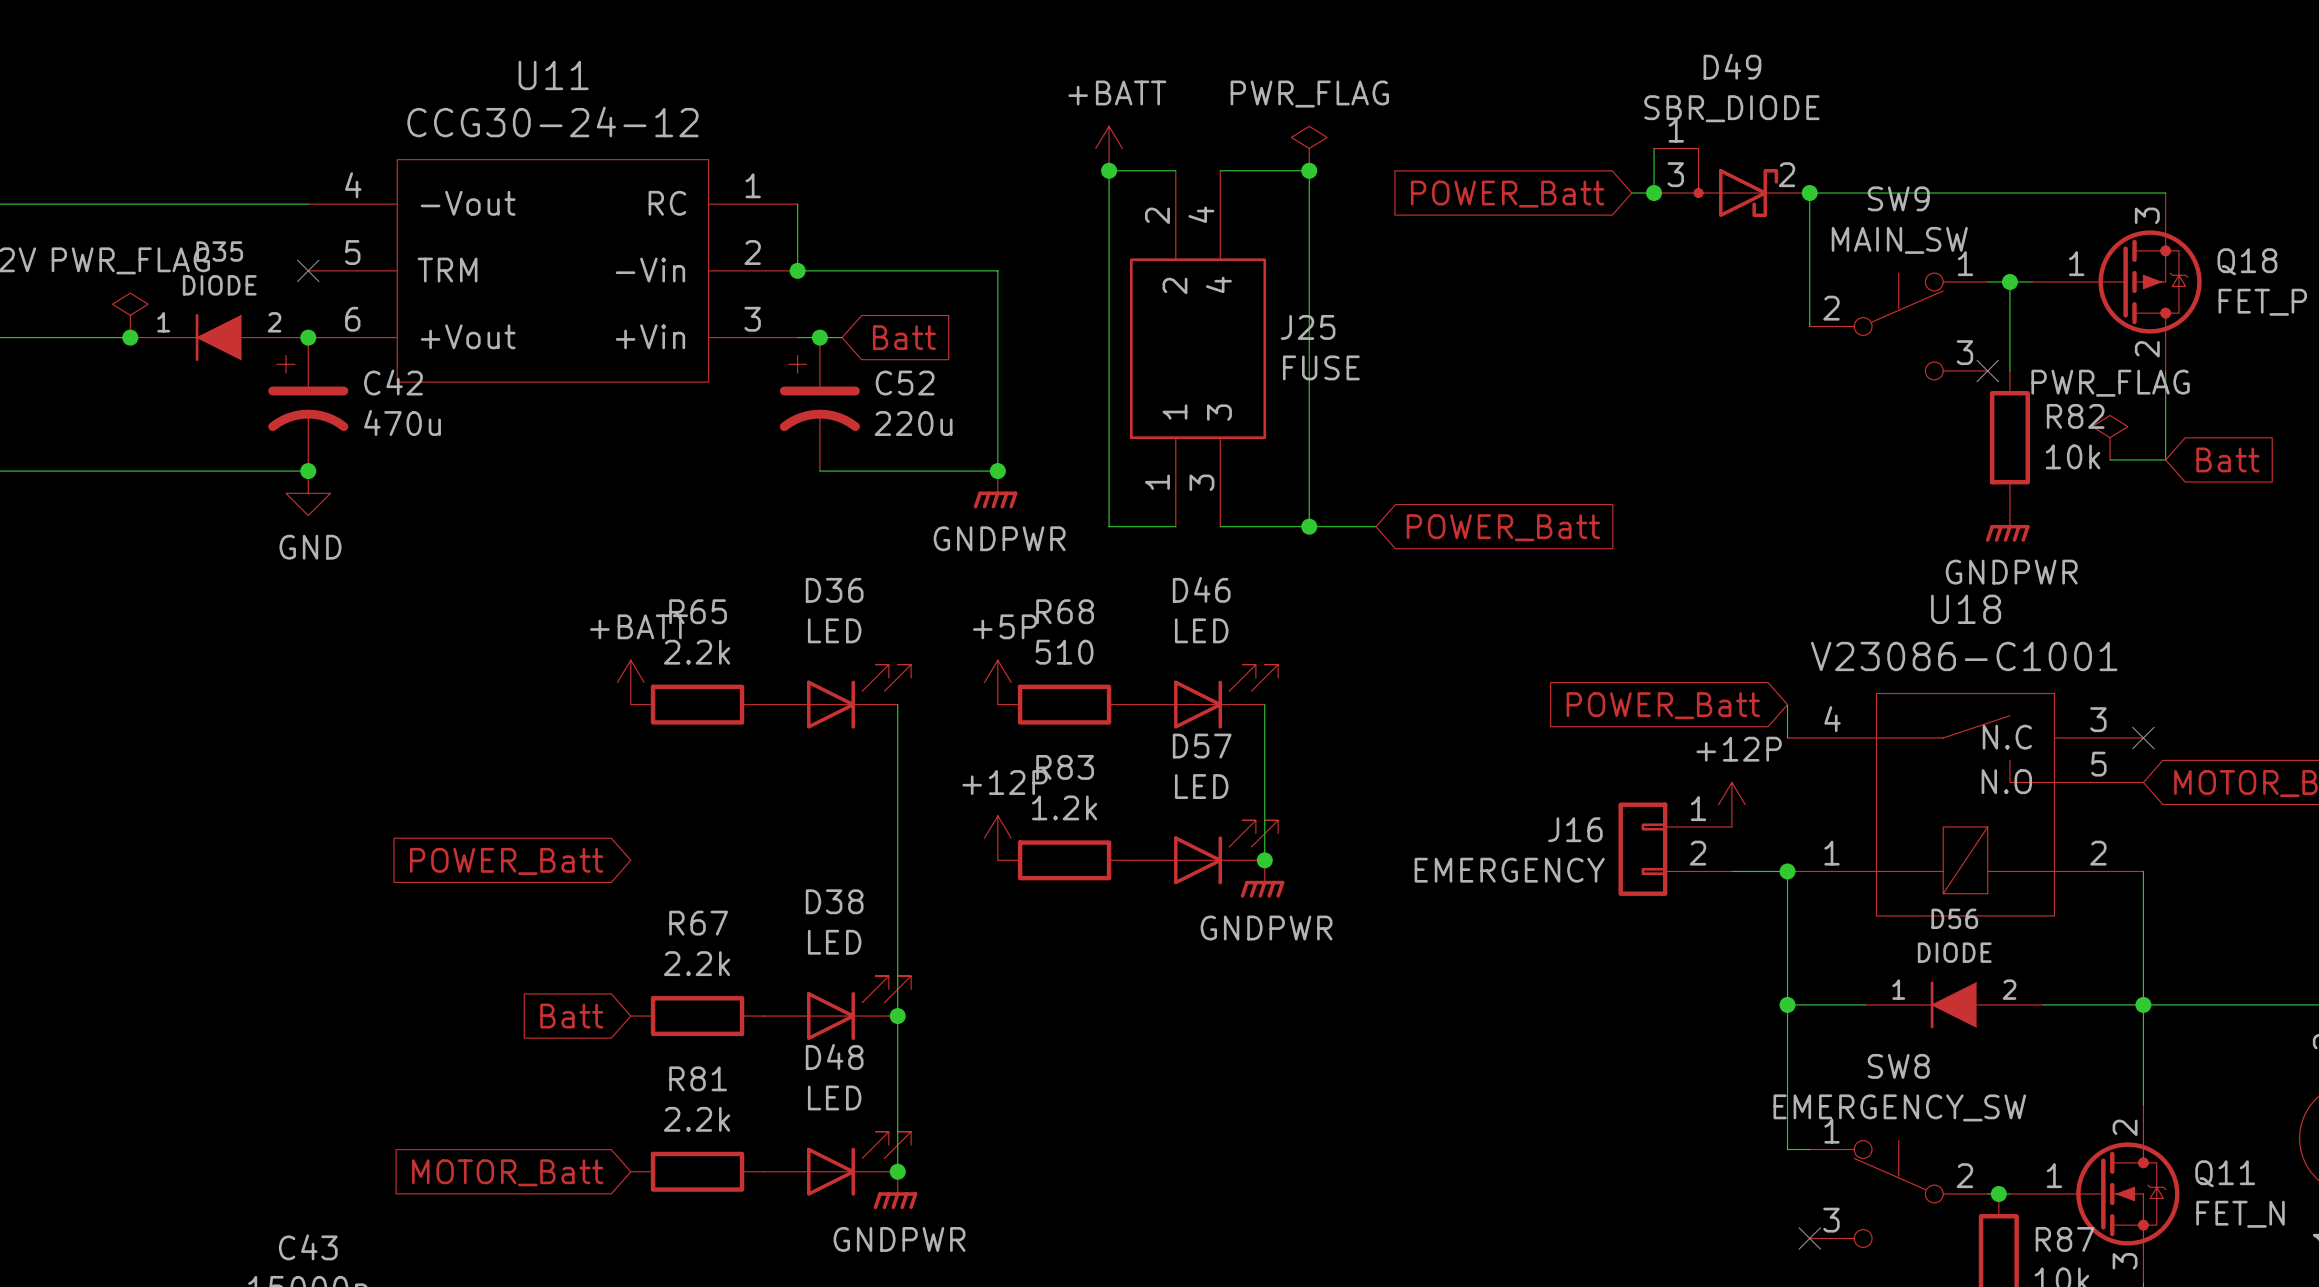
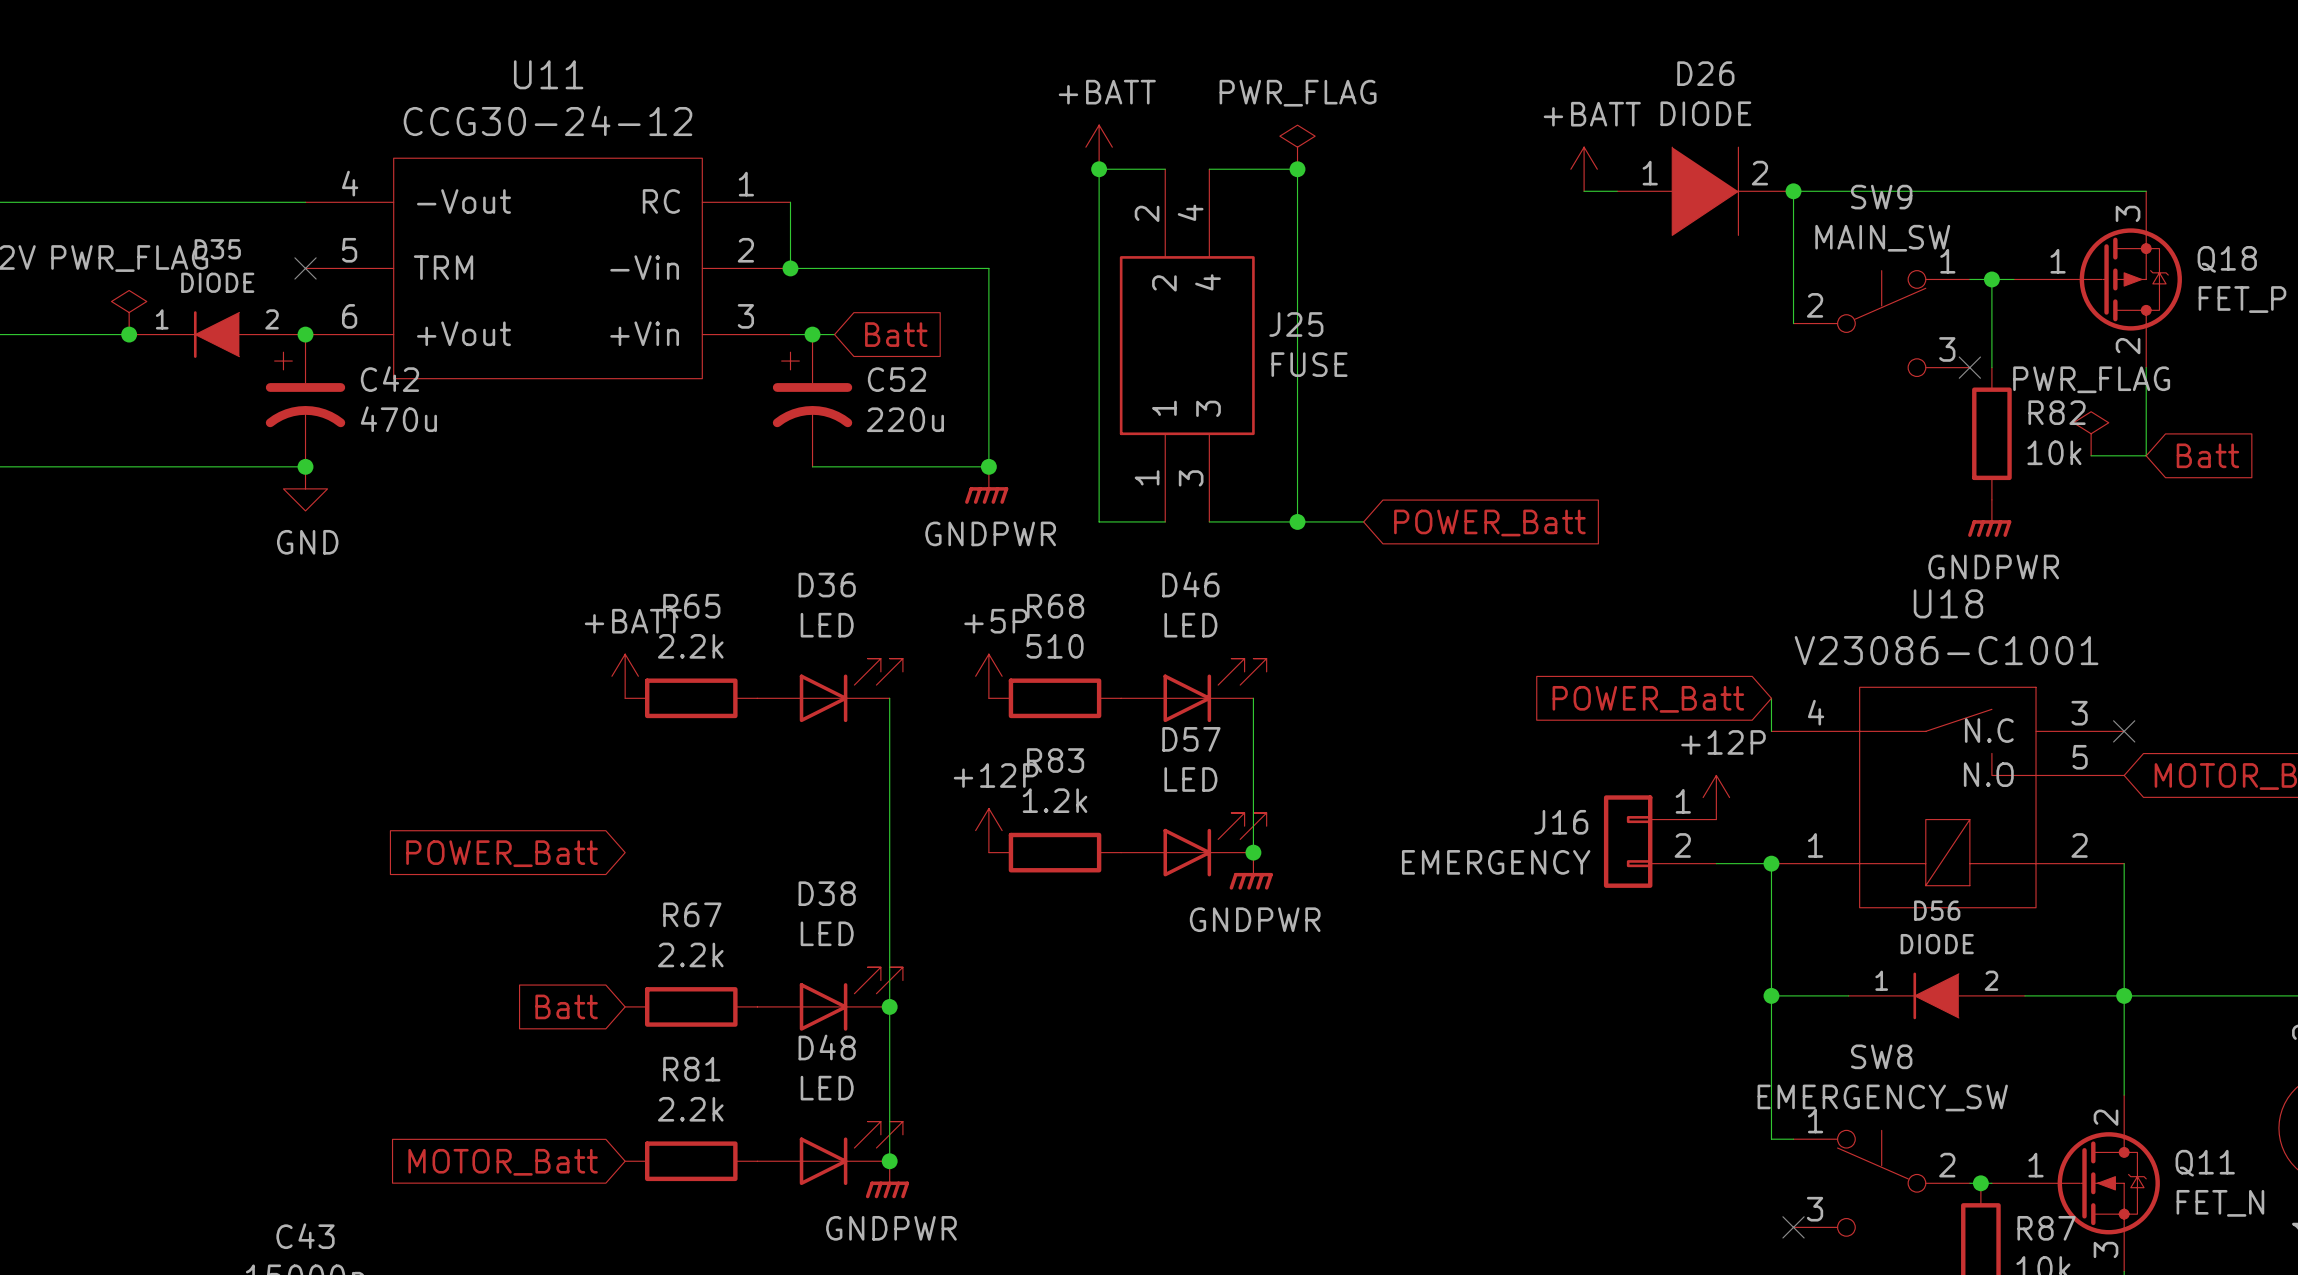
wire: (1654, 148) (1654, 193) (1631, 193) -> (1584, 191) (1617, 191)
power symbol: none -> +BATT (1584, 169)
D49: SBR_DIODE (1731, 182) -> none
junction: (1654, 193) -> none
D26: none -> DIODE (1705, 191)
global label: POWER_Batt (1507, 194) -> none

